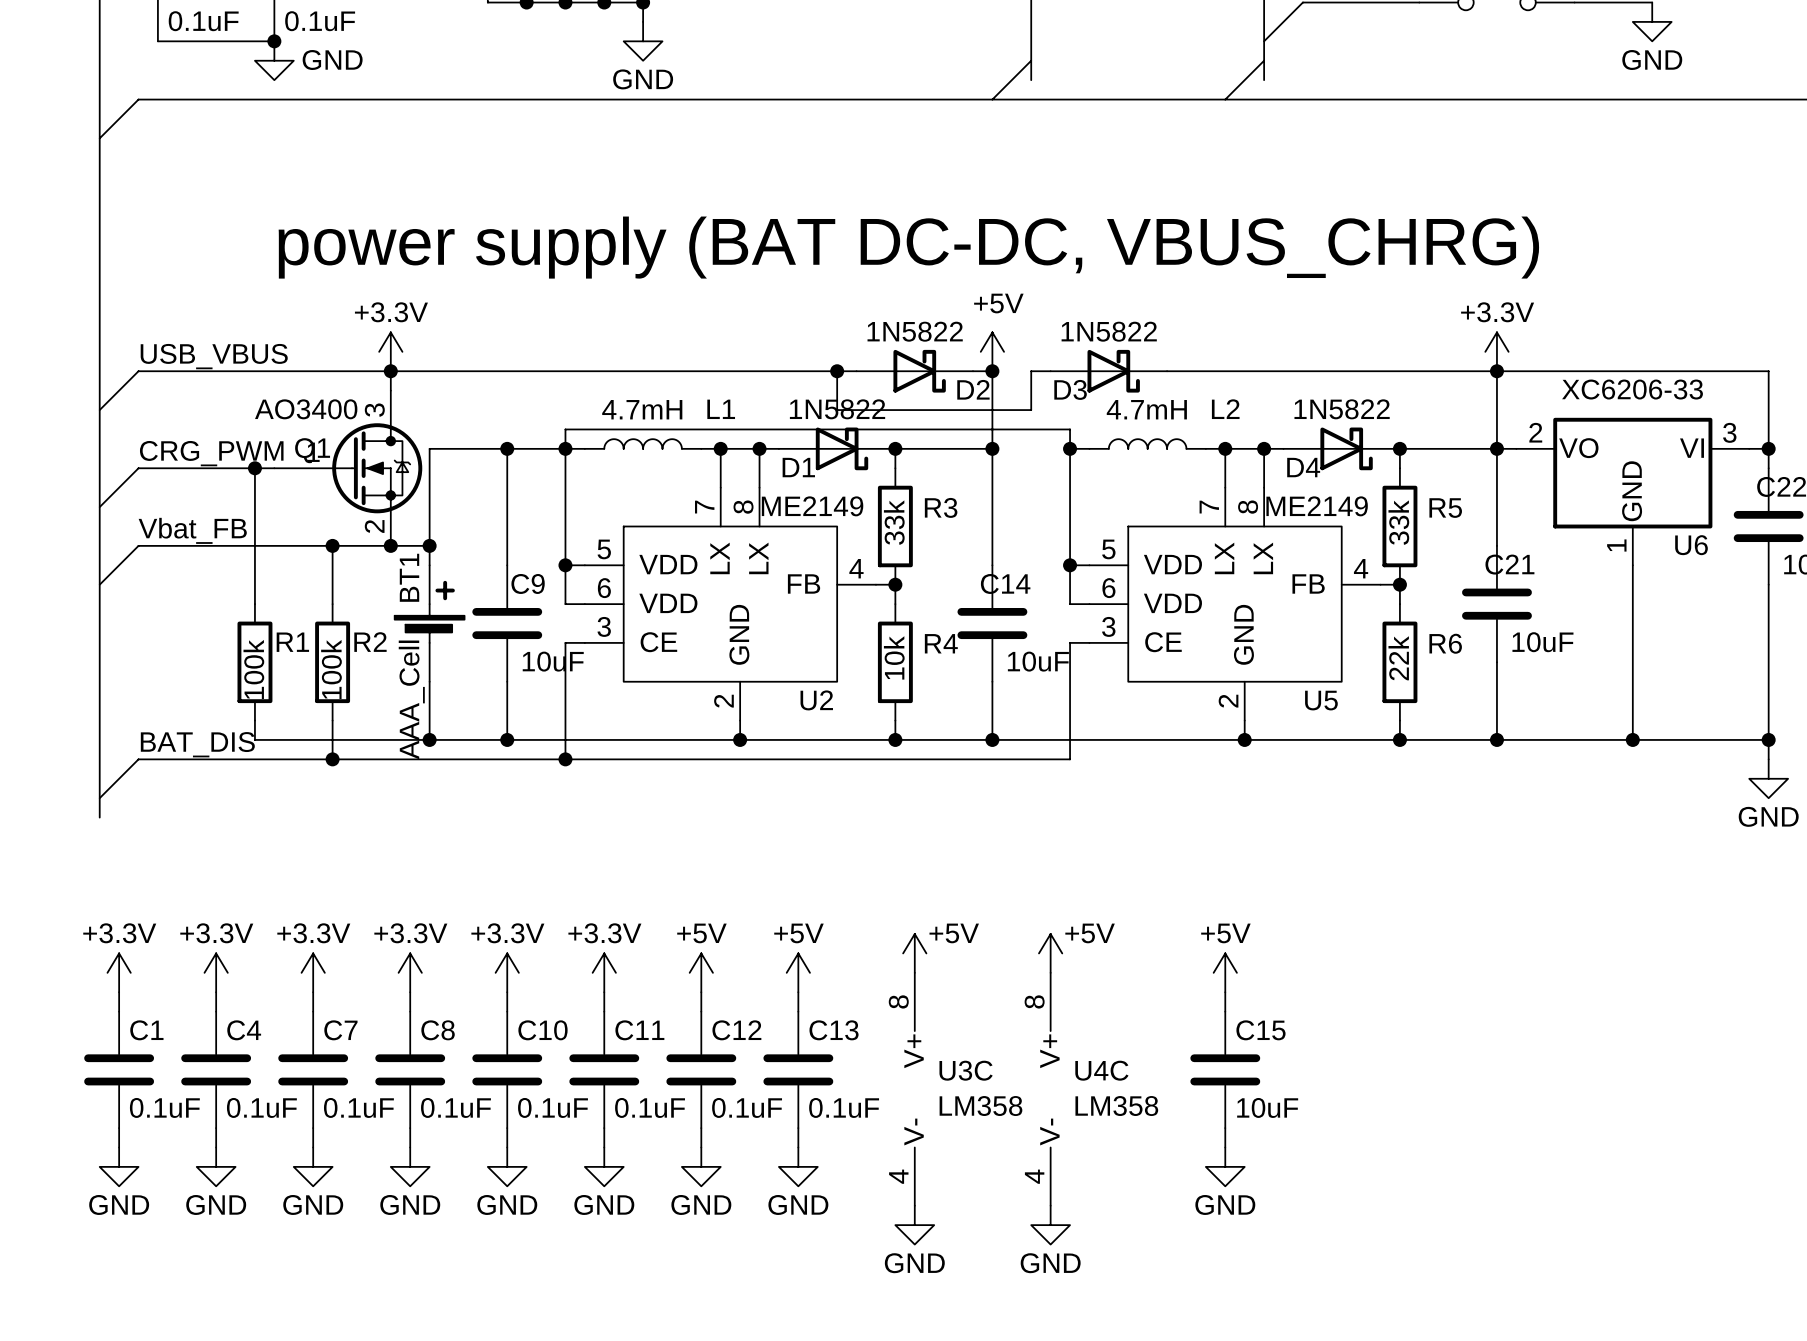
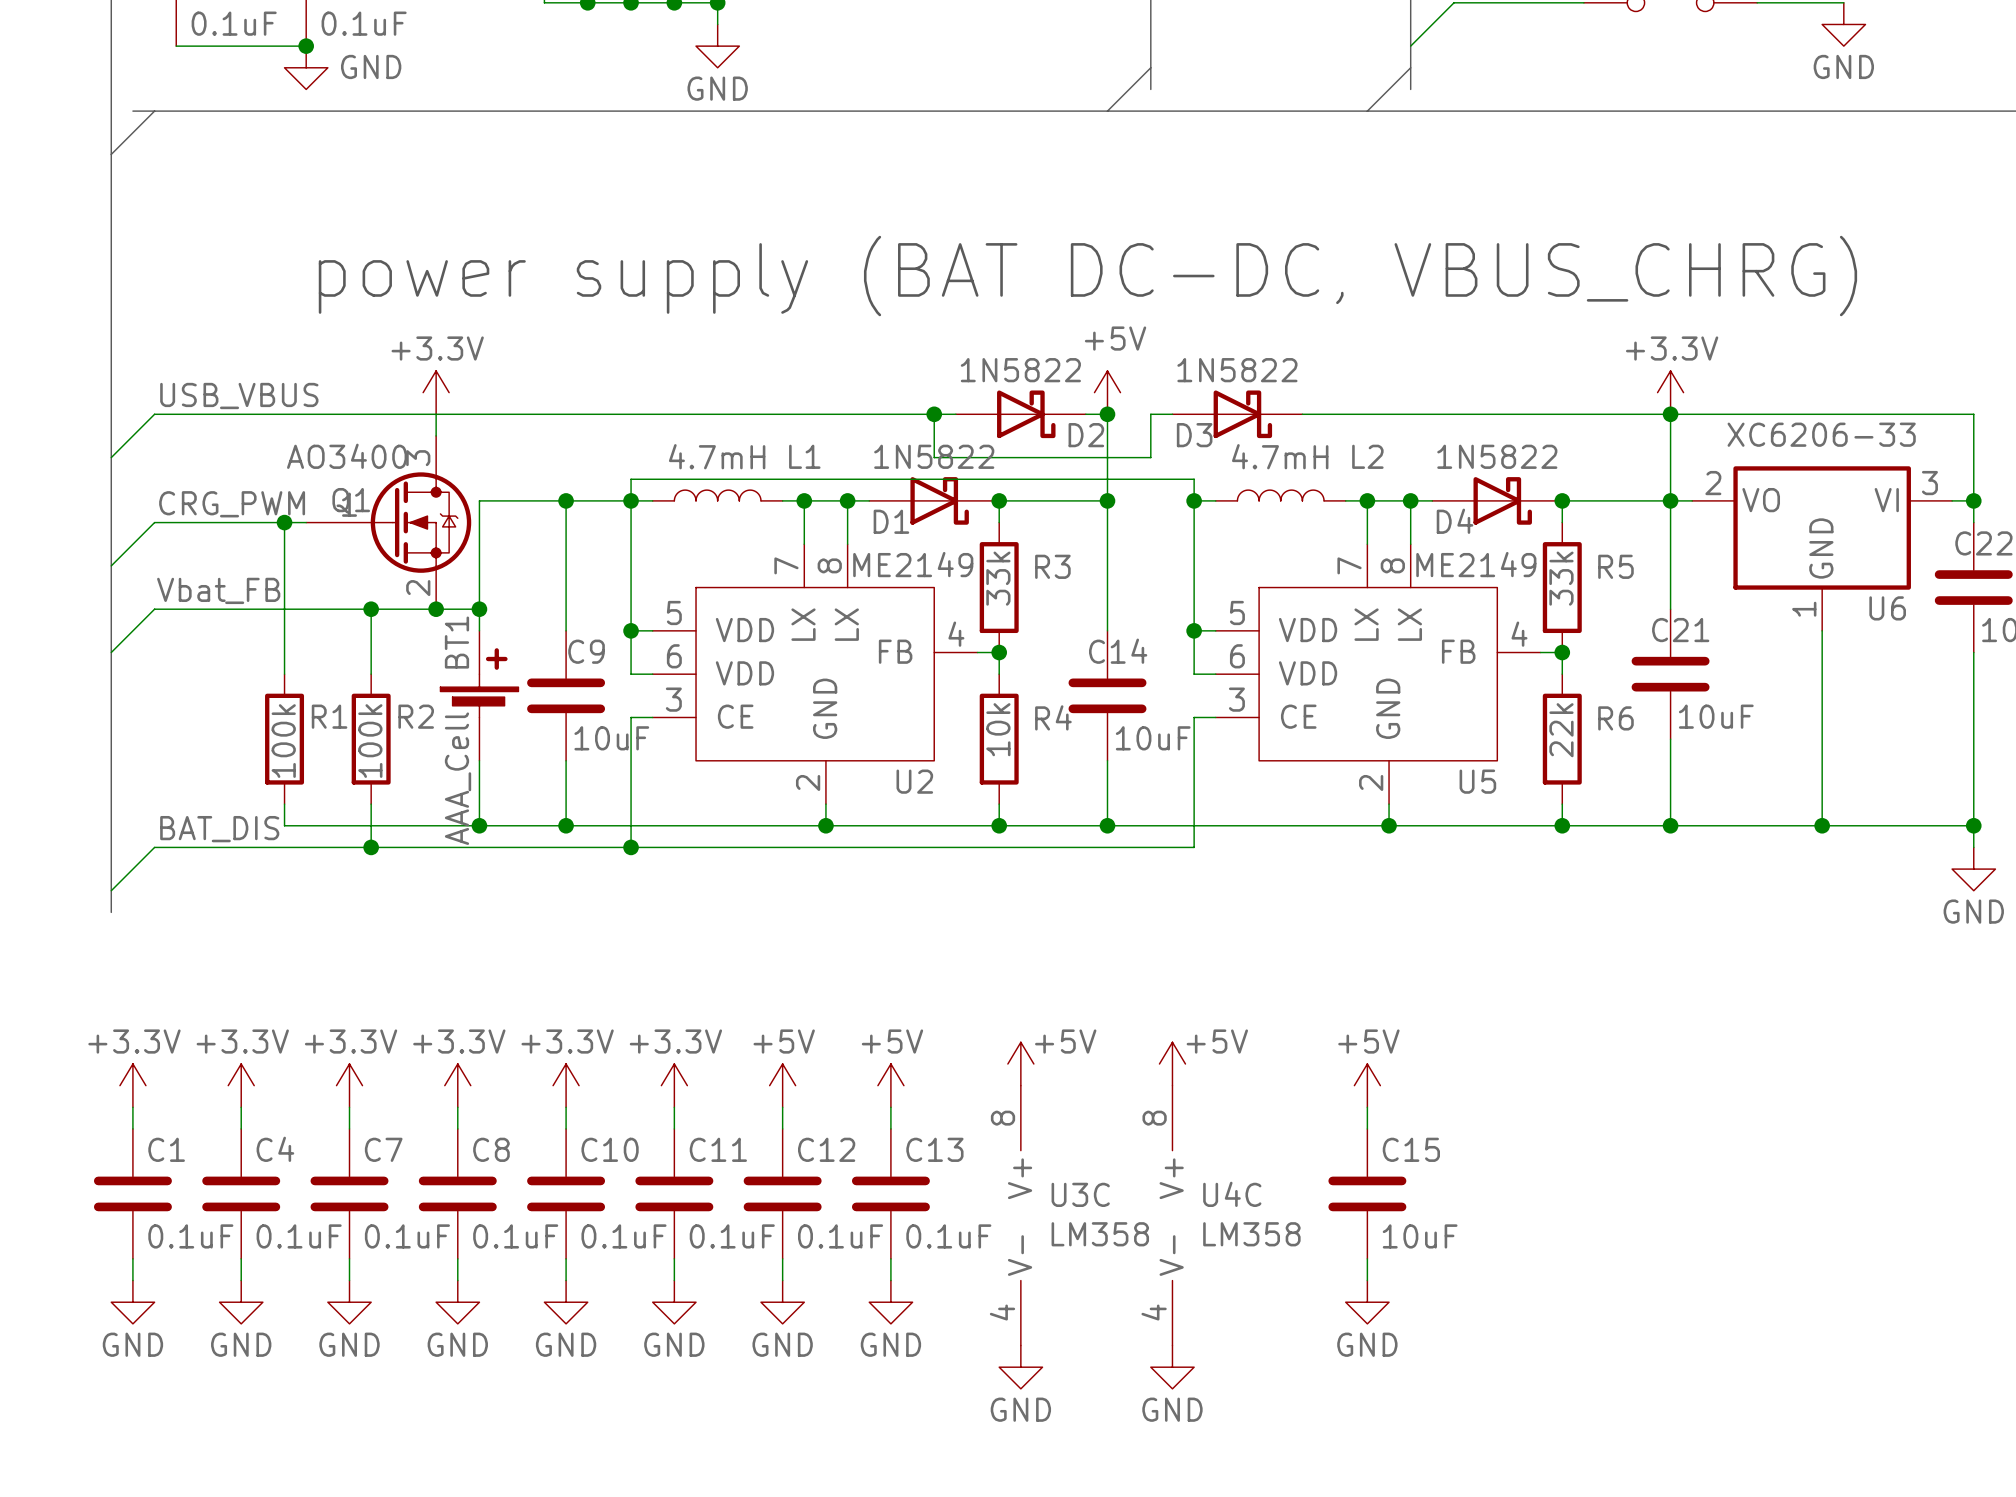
bus: none -> (132, 111) (154, 111)
junction: (390, 371) -> none

